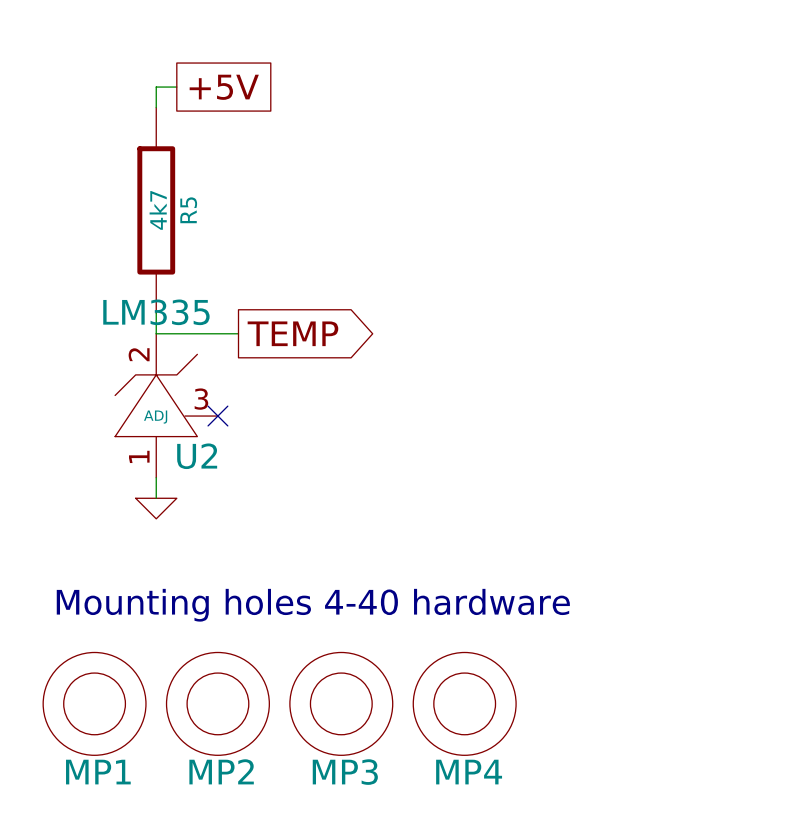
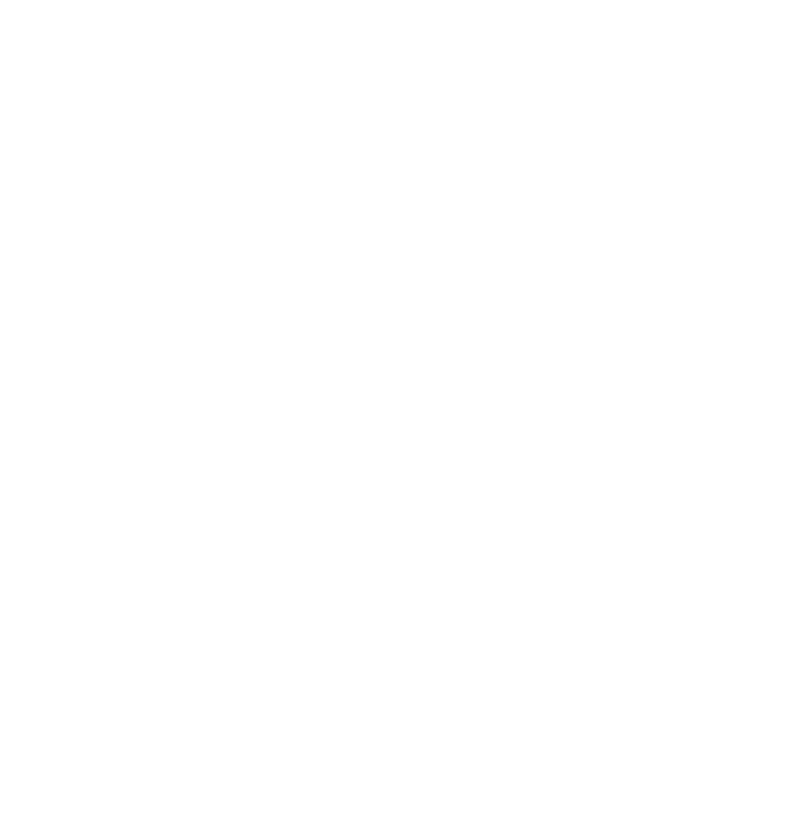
wire: (176, 87) (156, 87) (156, 107) -> none
global label: +5V (224, 87) -> none
R5: 4k7 (156, 210) -> none
wire: (156, 313) (156, 333) (238, 333) -> none
global label: TEMP (292, 333) -> none
U2: LM335 (166, 405) -> none
no-connect mark: (217, 416) -> none
wire: (156, 477) (156, 498) -> none
power symbol: (156, 508) -> none
text: Mounting holes 4-40 hardware (313, 605) -> none
MP1: (94, 703) -> none
MP2: (217, 703) -> none
MP3: (341, 703) -> none
MP4: (464, 703) -> none

